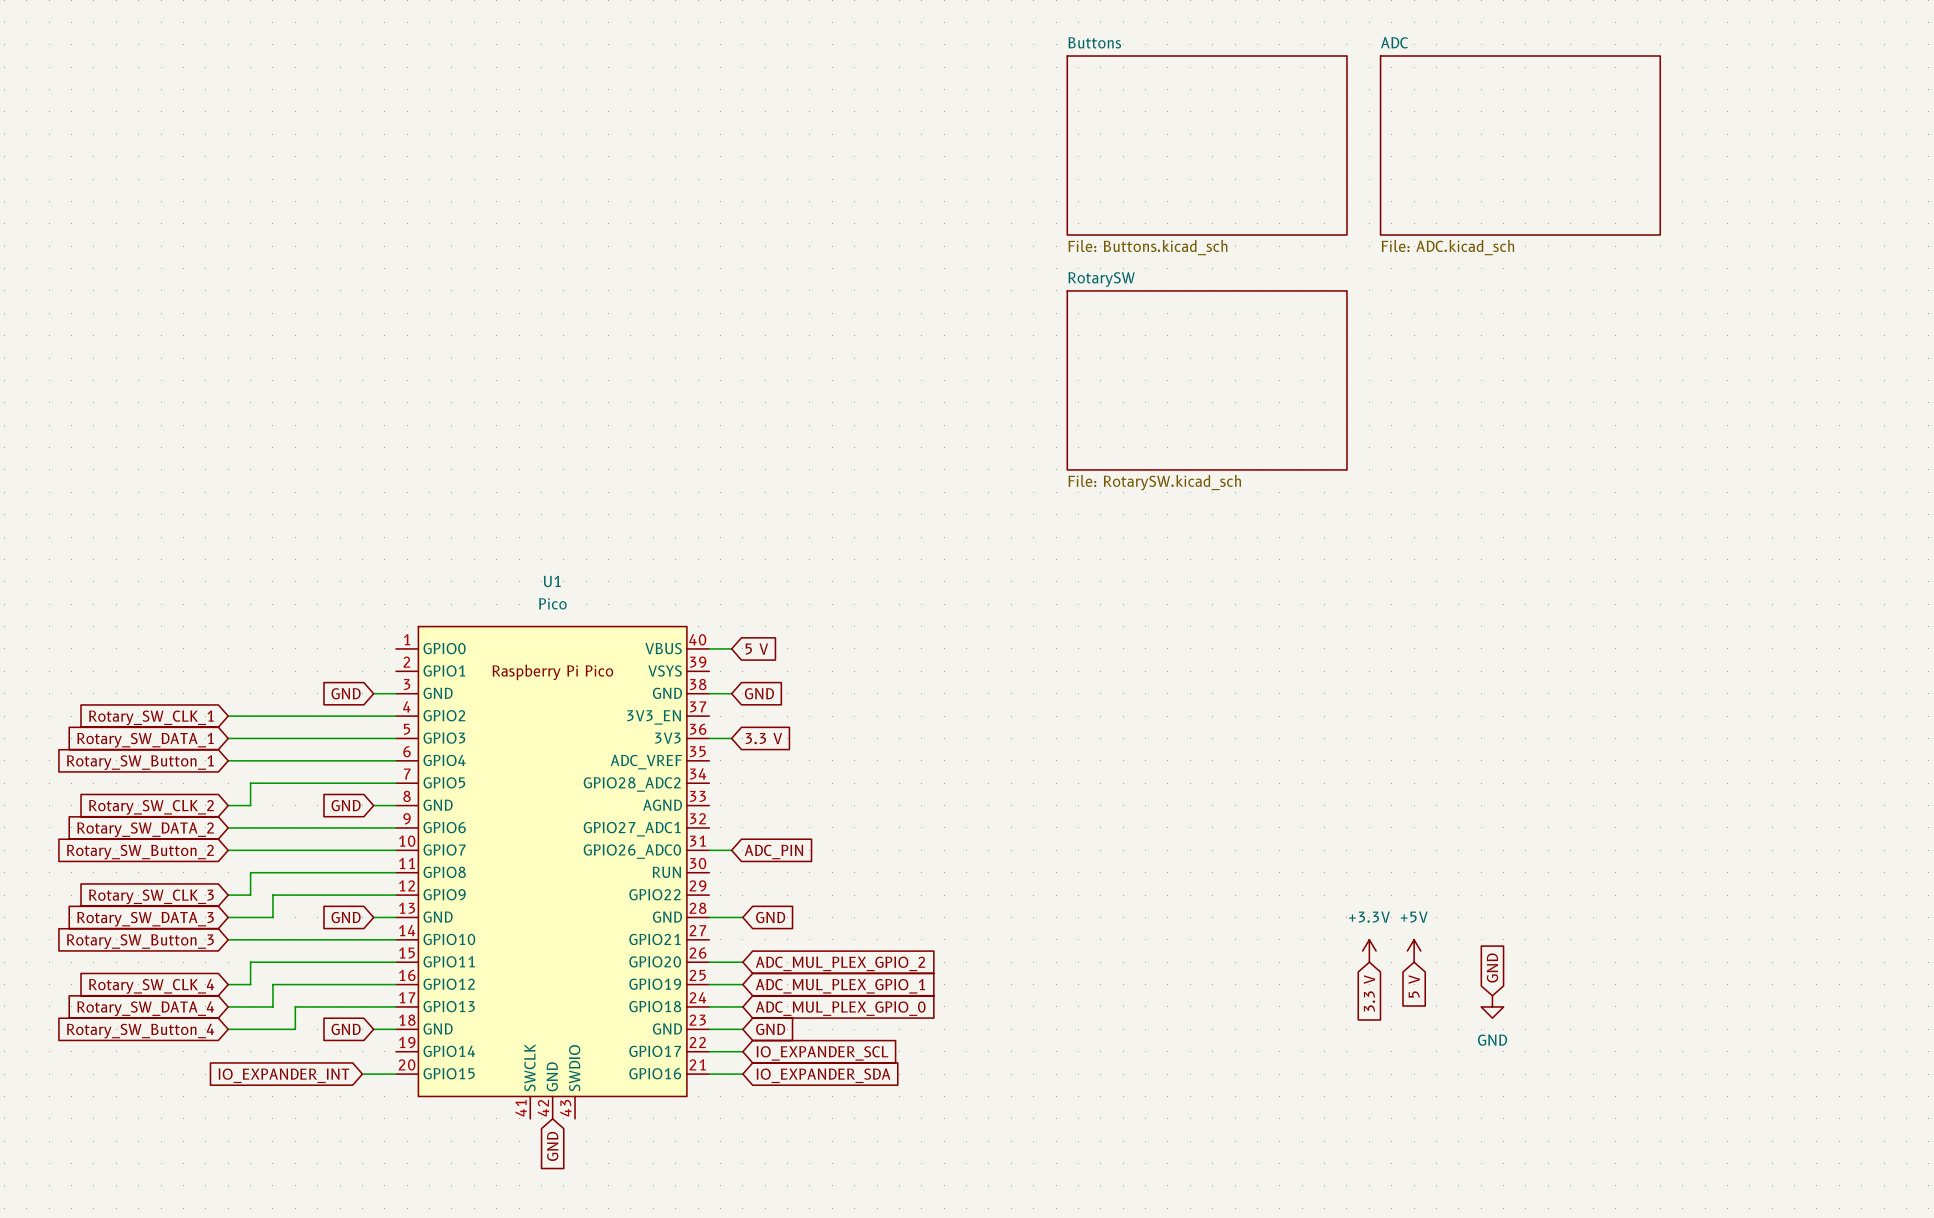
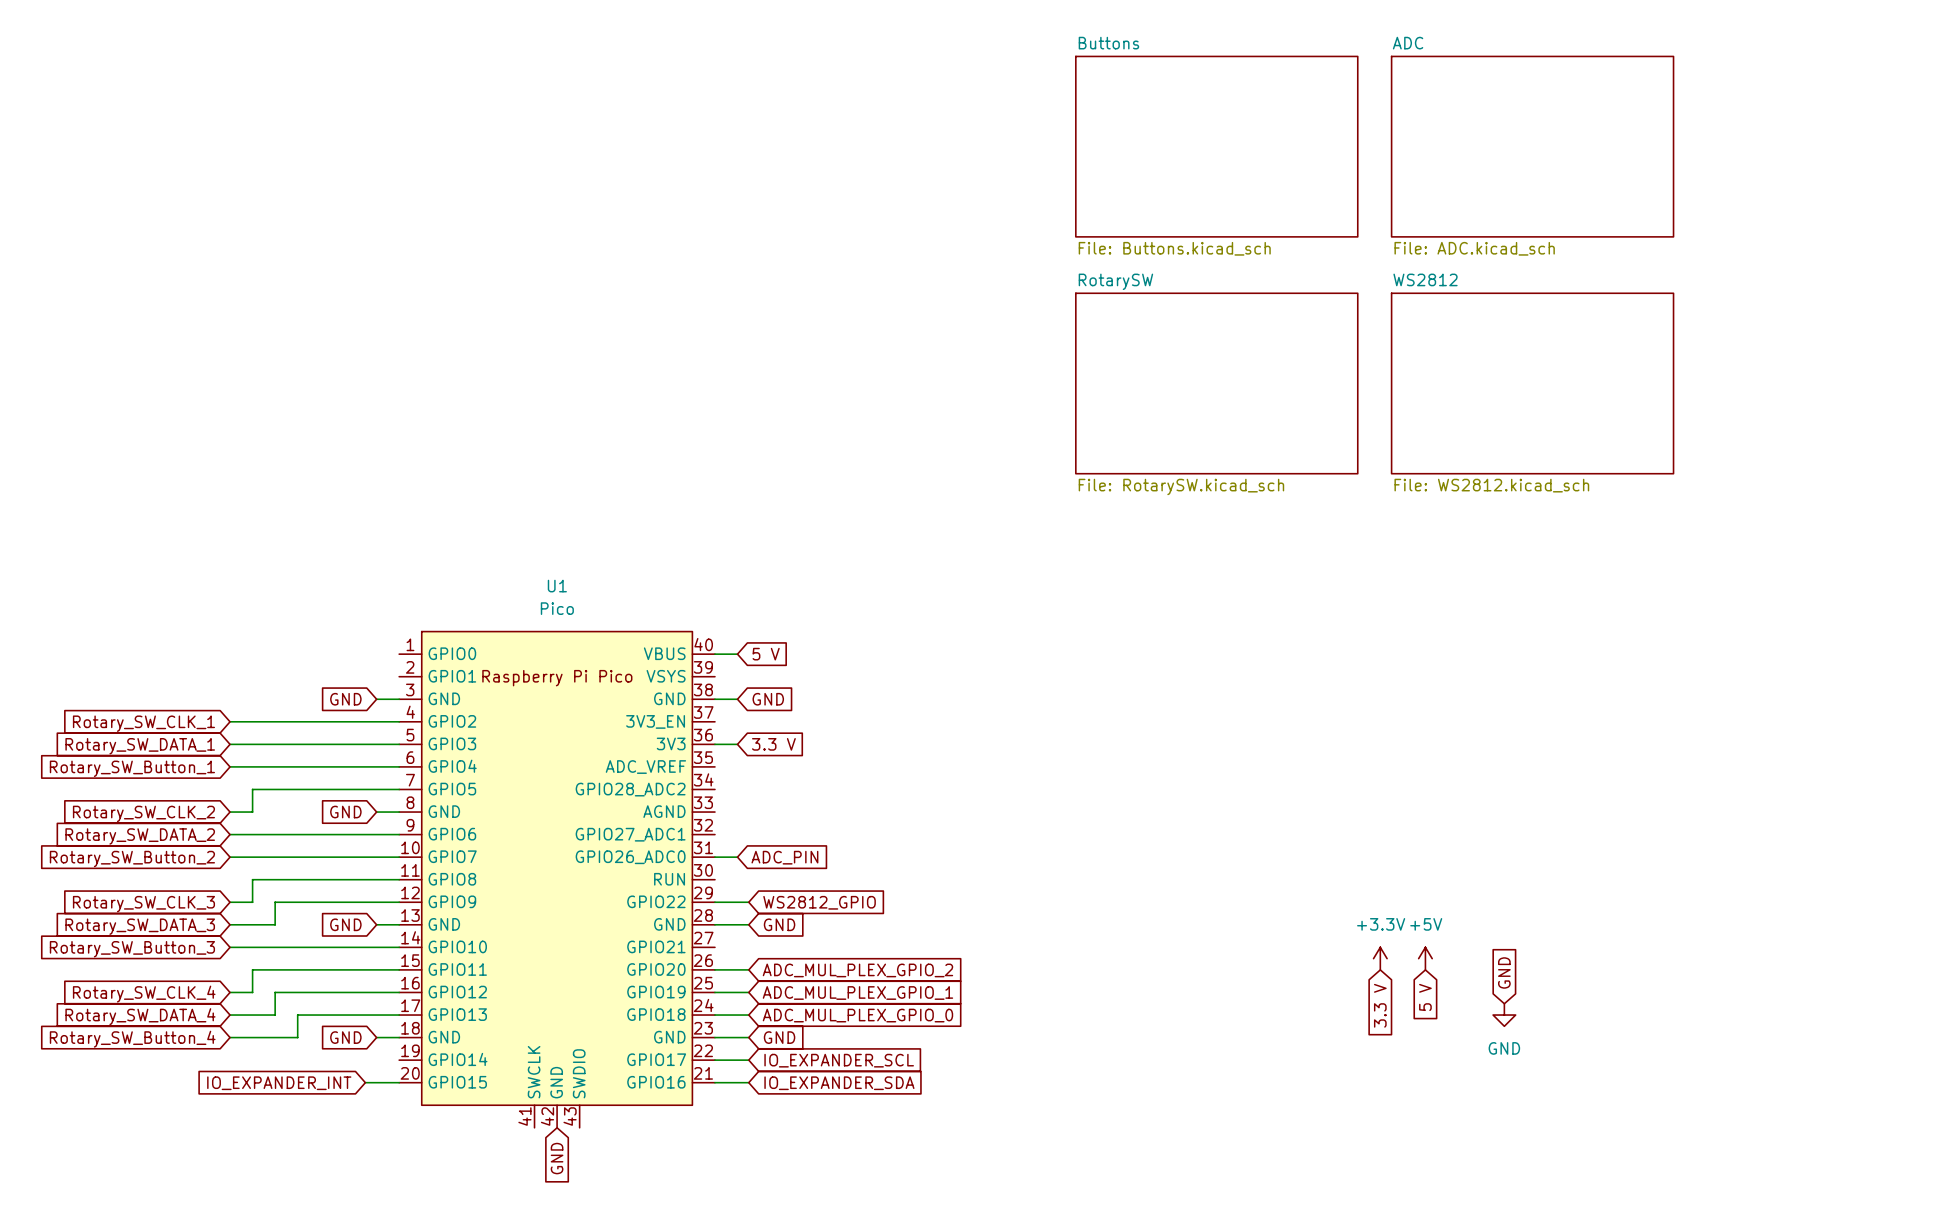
sheet WS2812: none -> File: WS2812.kicad_sch (1532, 383)
wire: none -> (714, 902) (748, 902)
global label: none -> WS2812_GPIO (819, 902)

